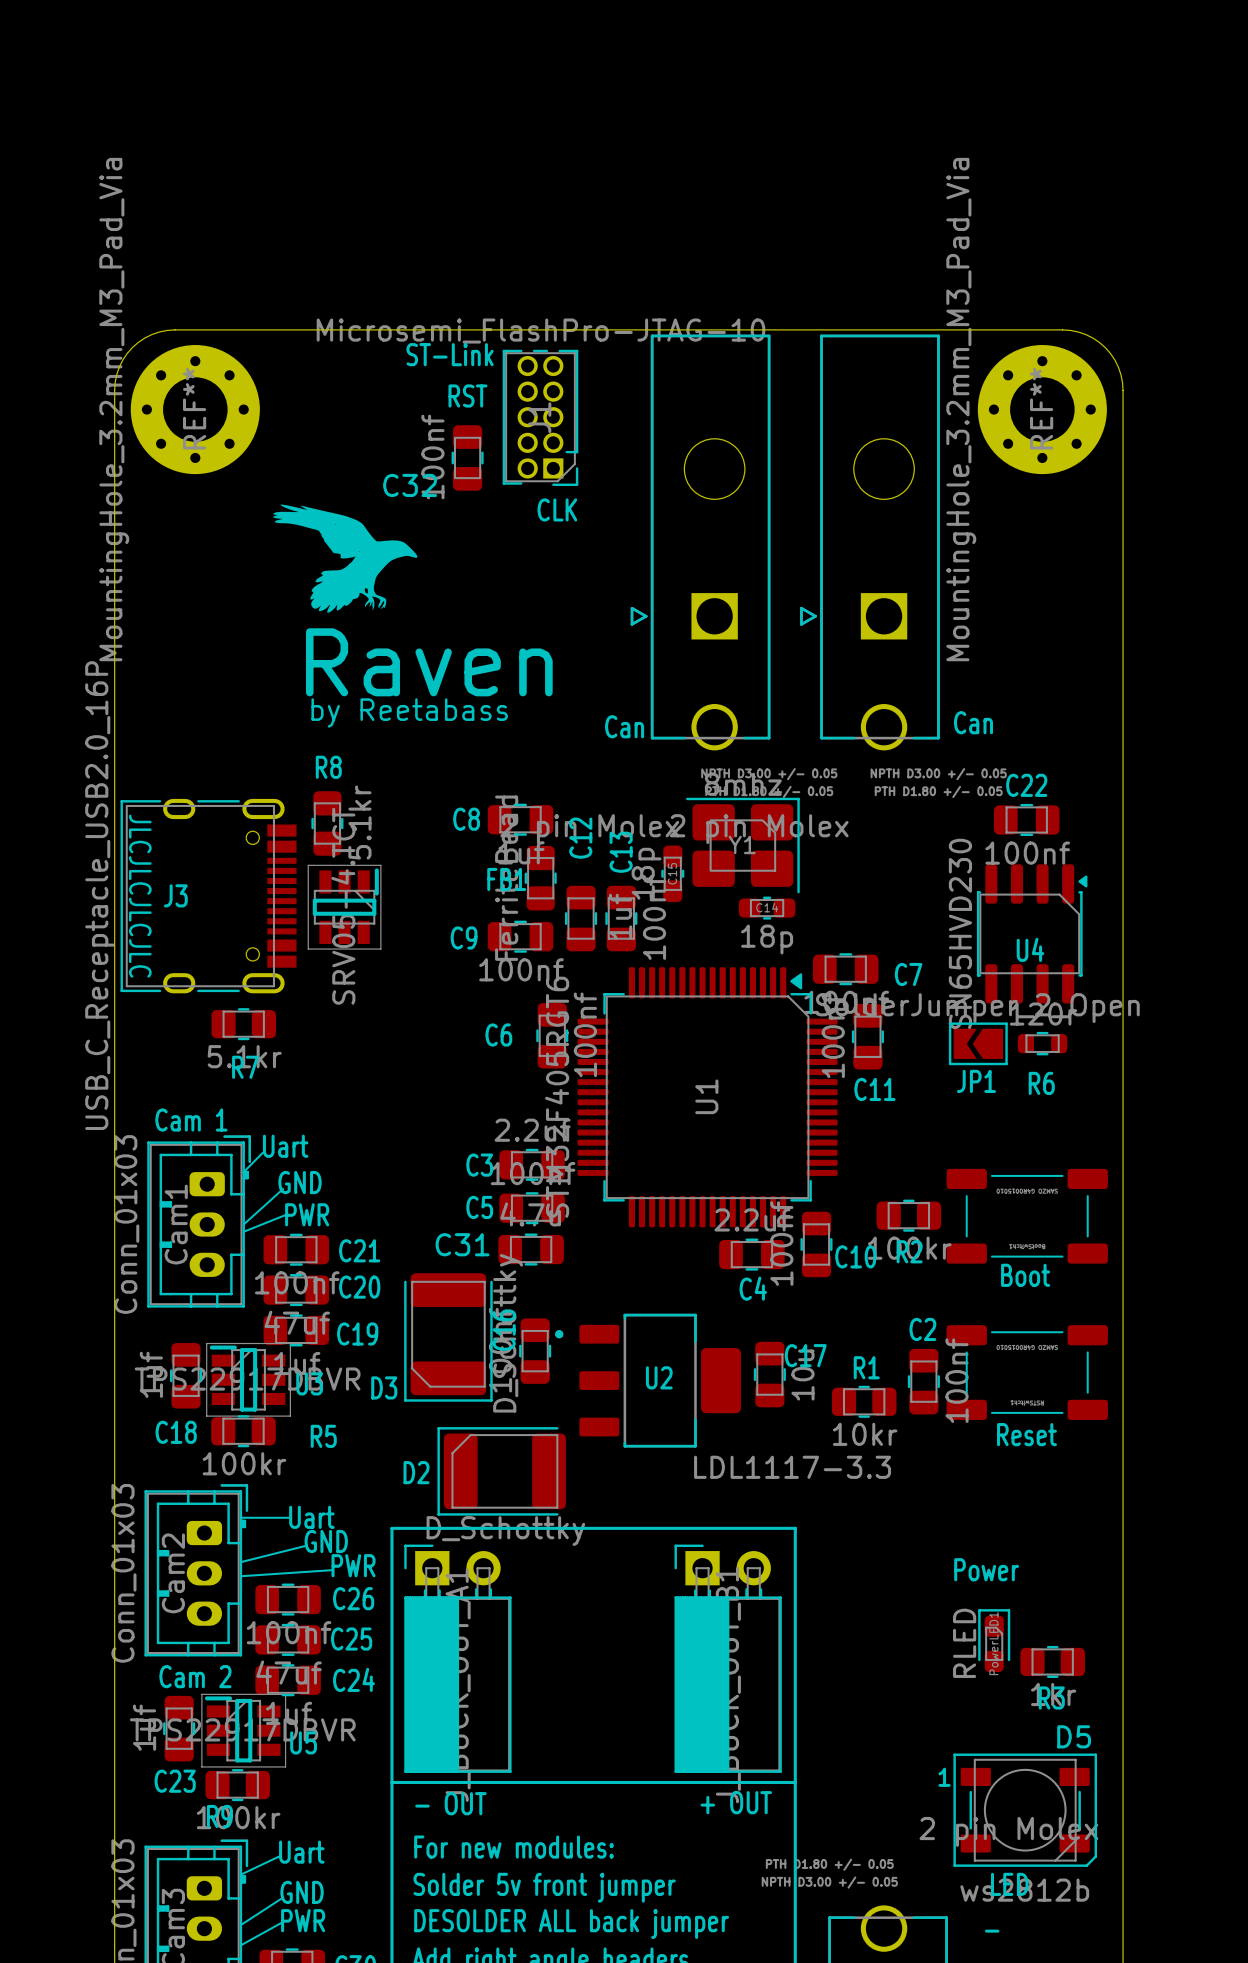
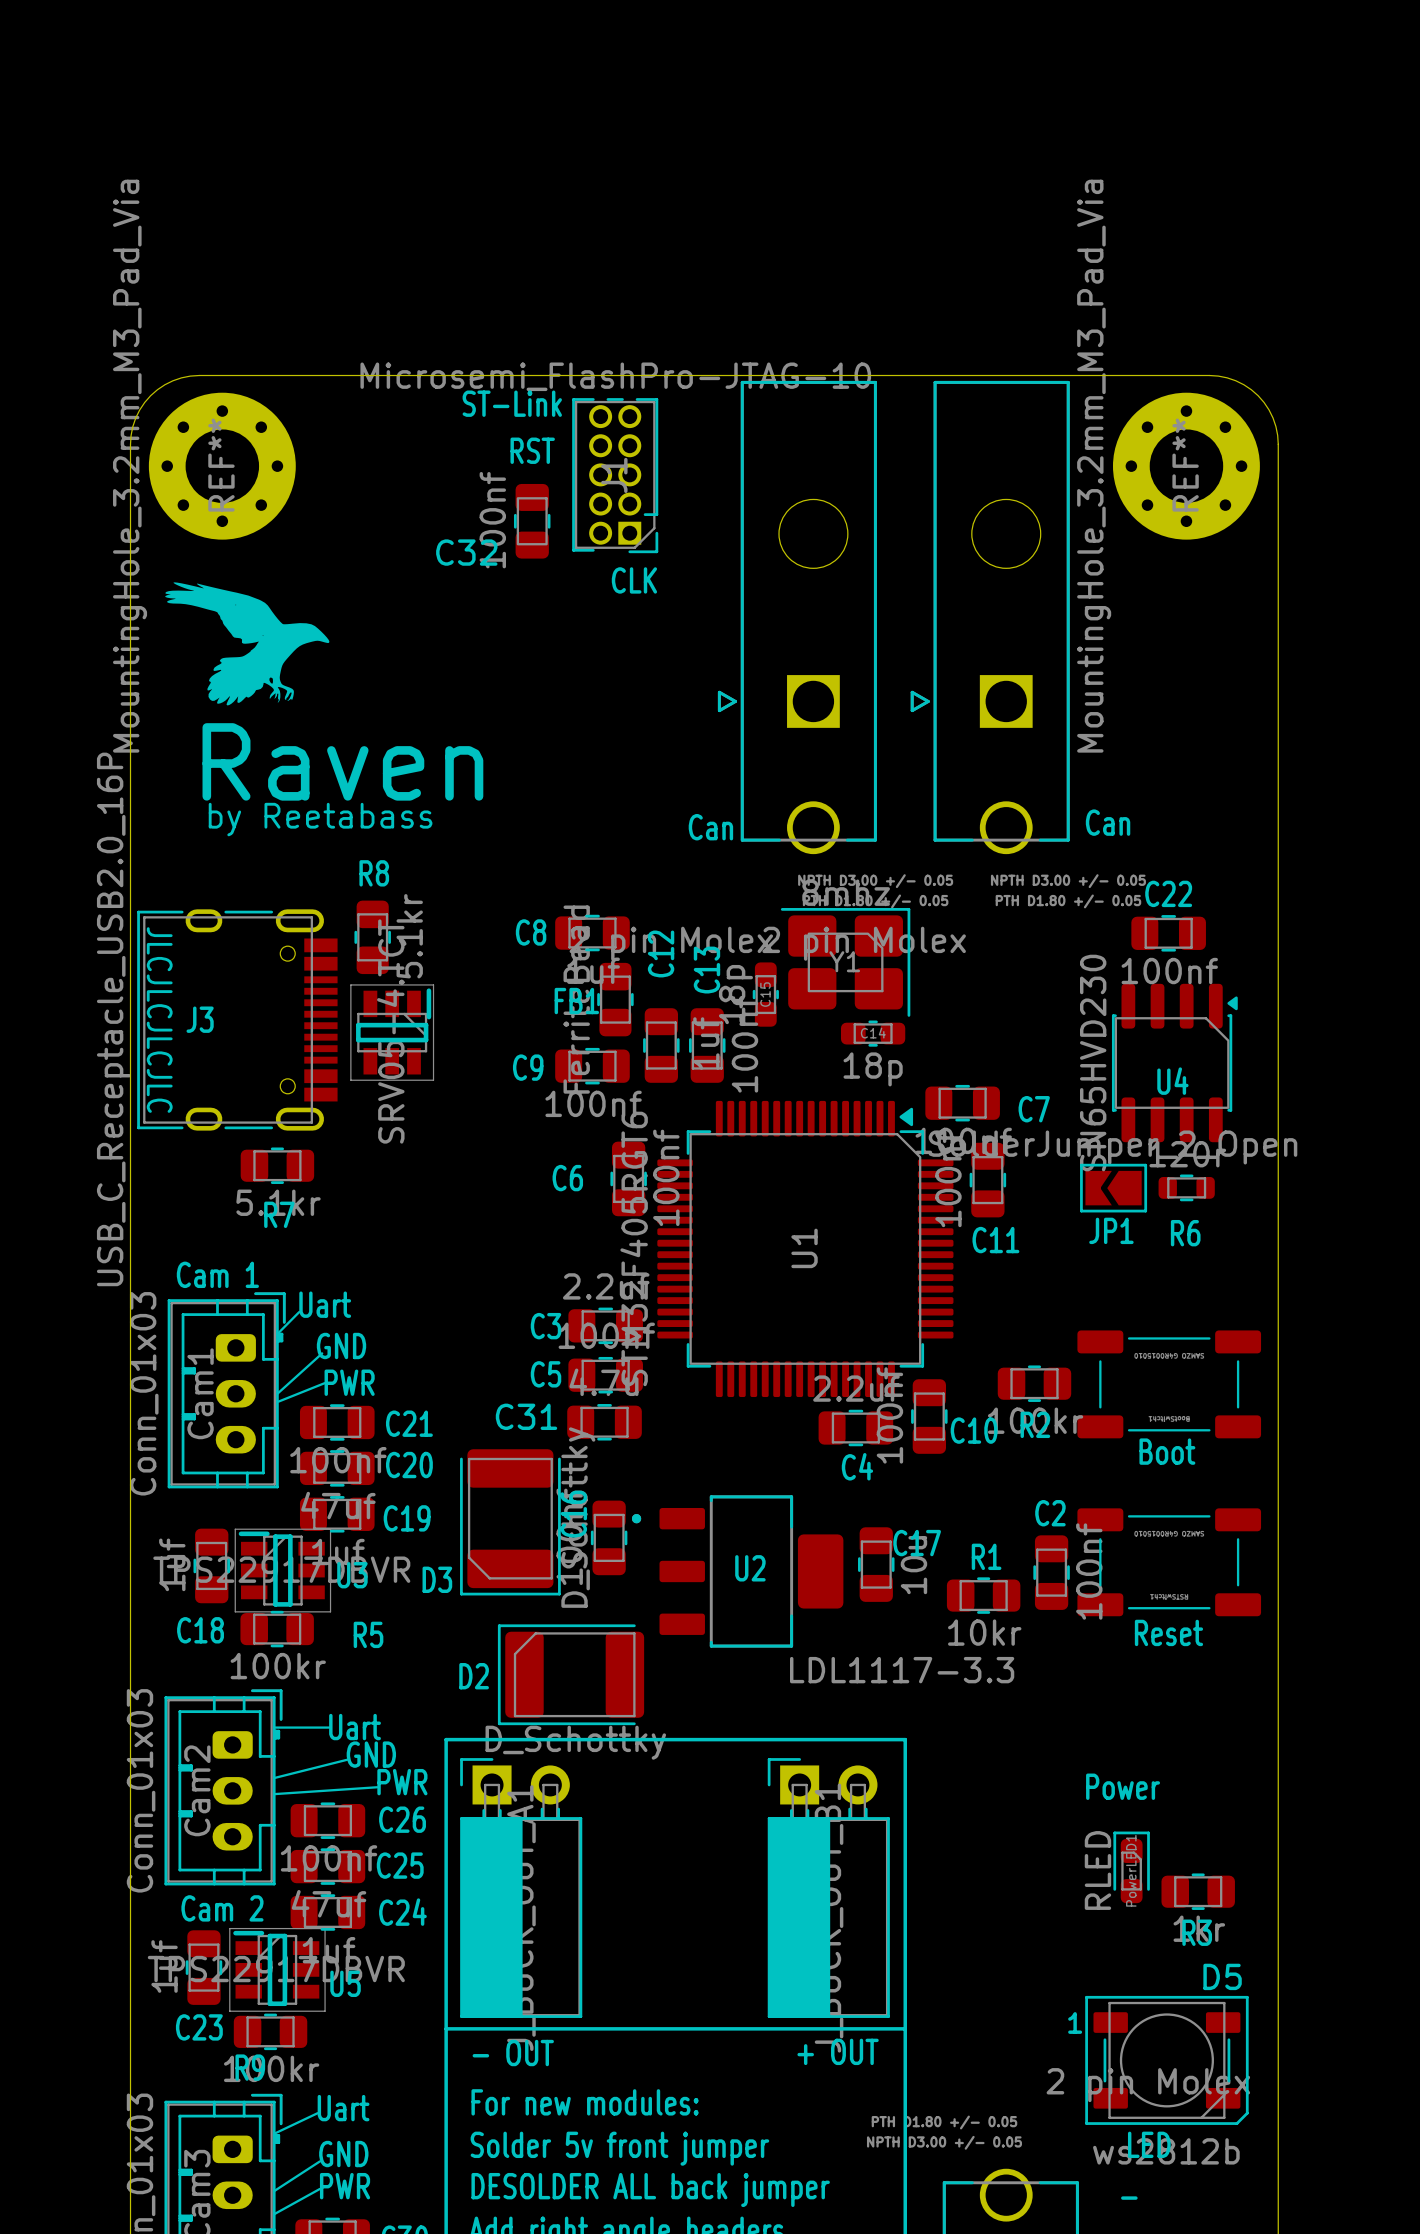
drawing position: (345, 558) -> (247, 643)
text position: Raven (429, 662) -> Raven (342, 761)
text position: by Reetabass (409, 712) -> by Reetabass (320, 819)

